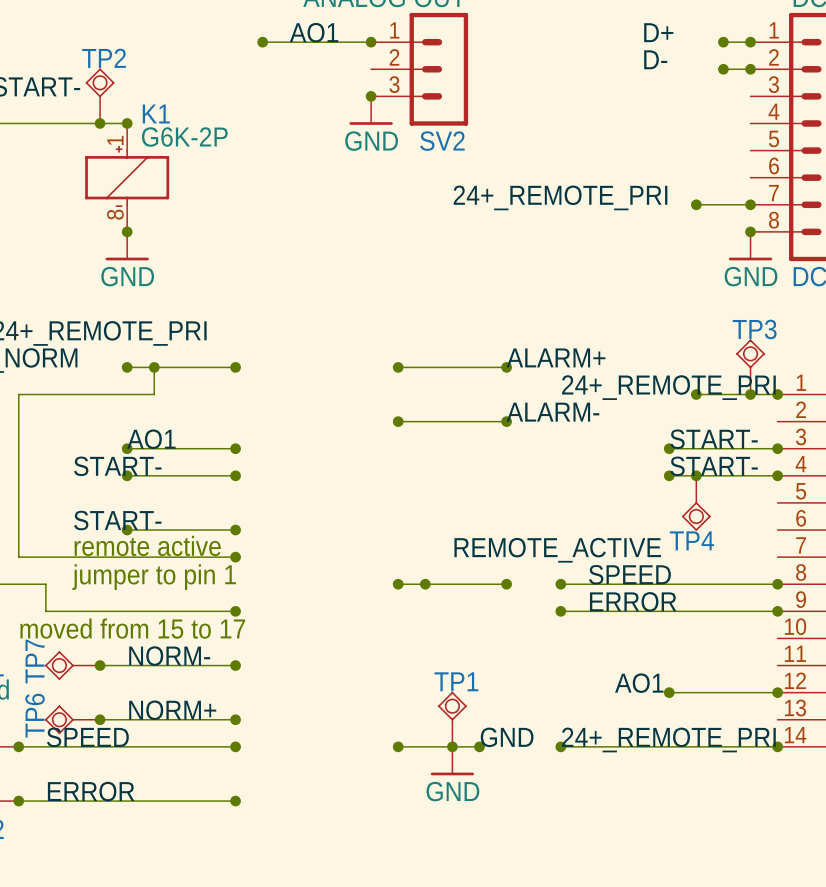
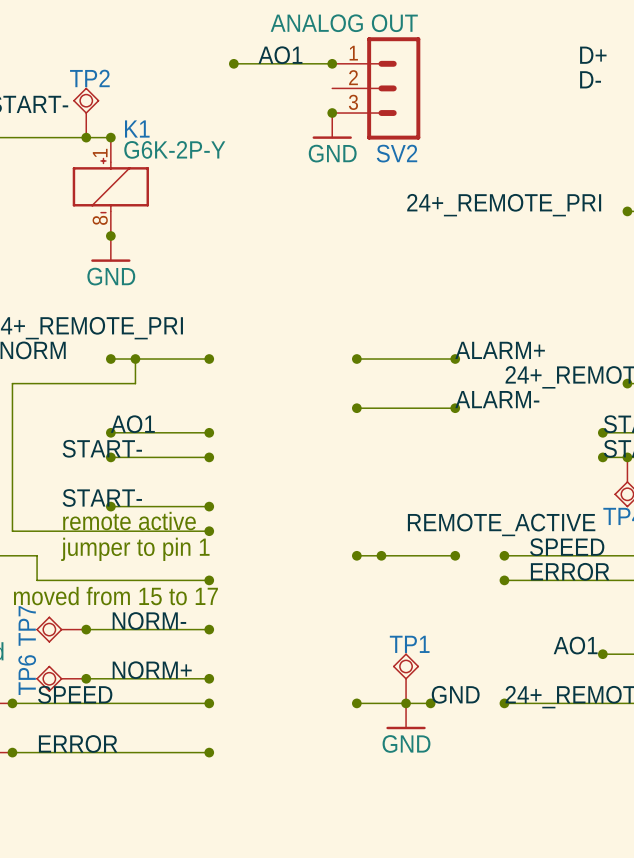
K1 value: G6K-2P (184, 137) -> G6K-2P-Y (174, 149)

